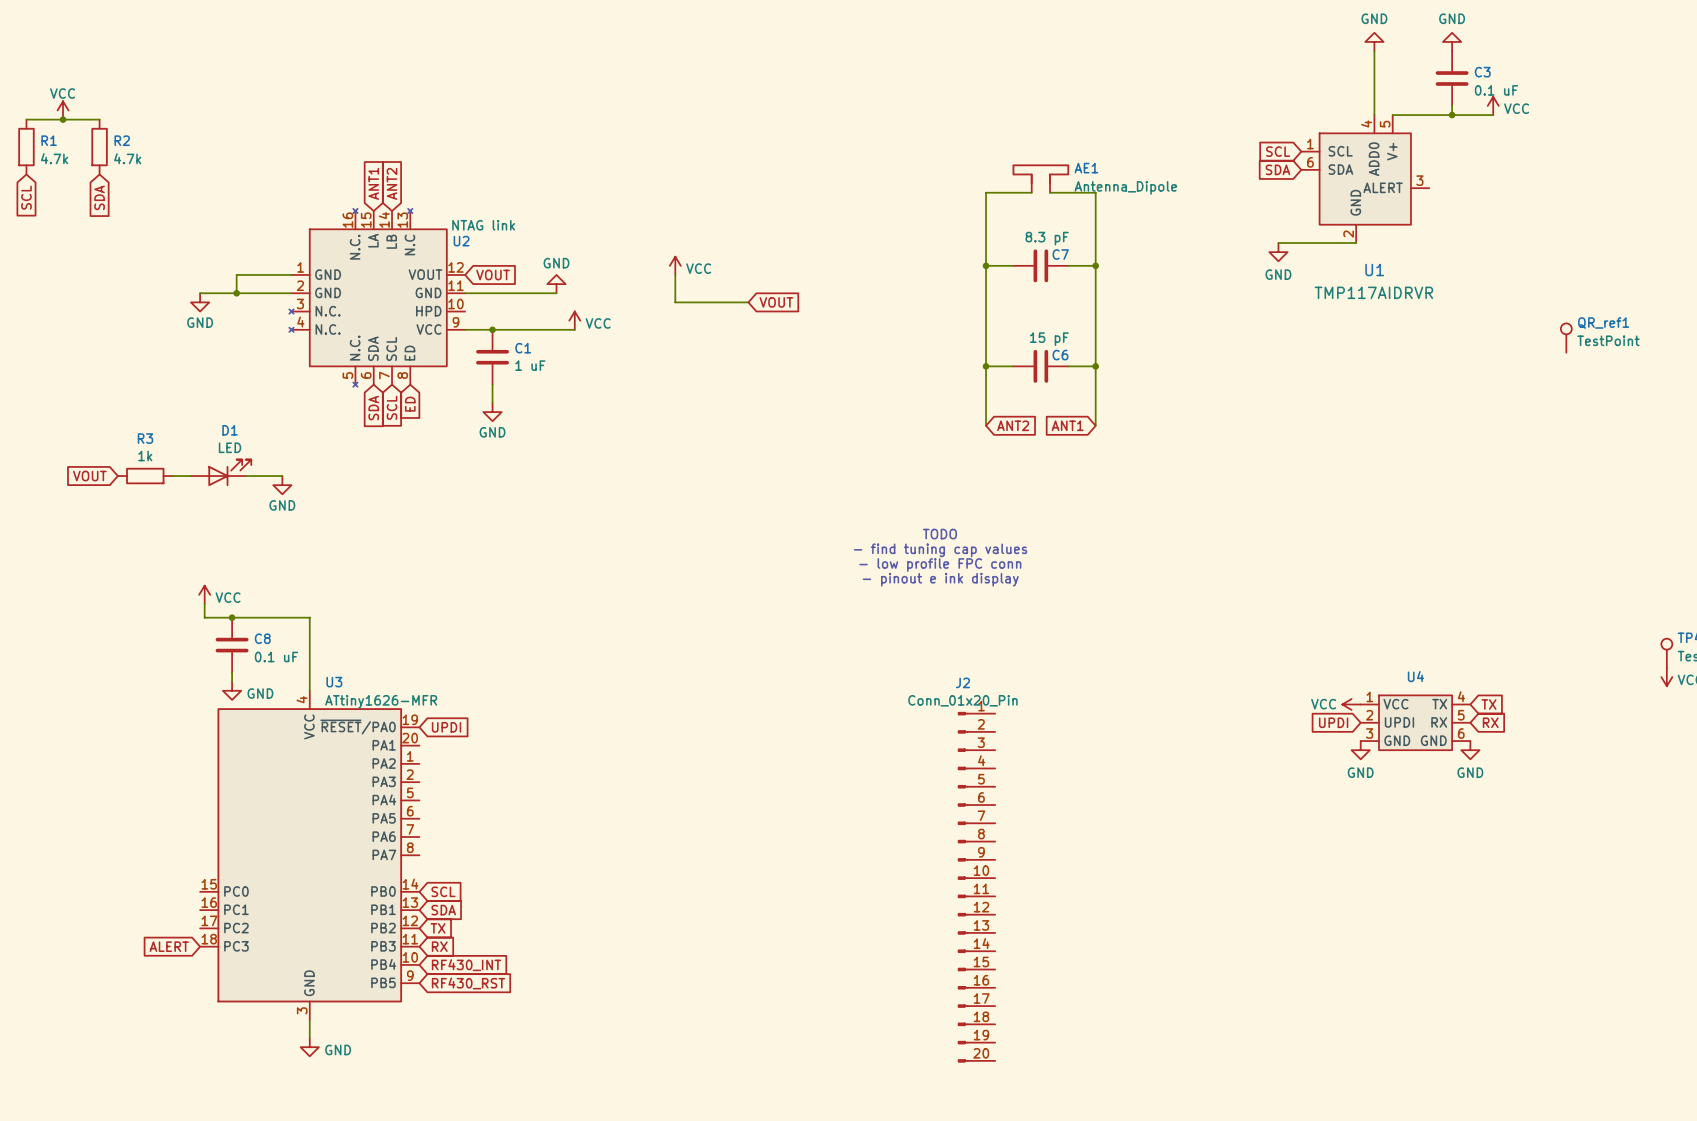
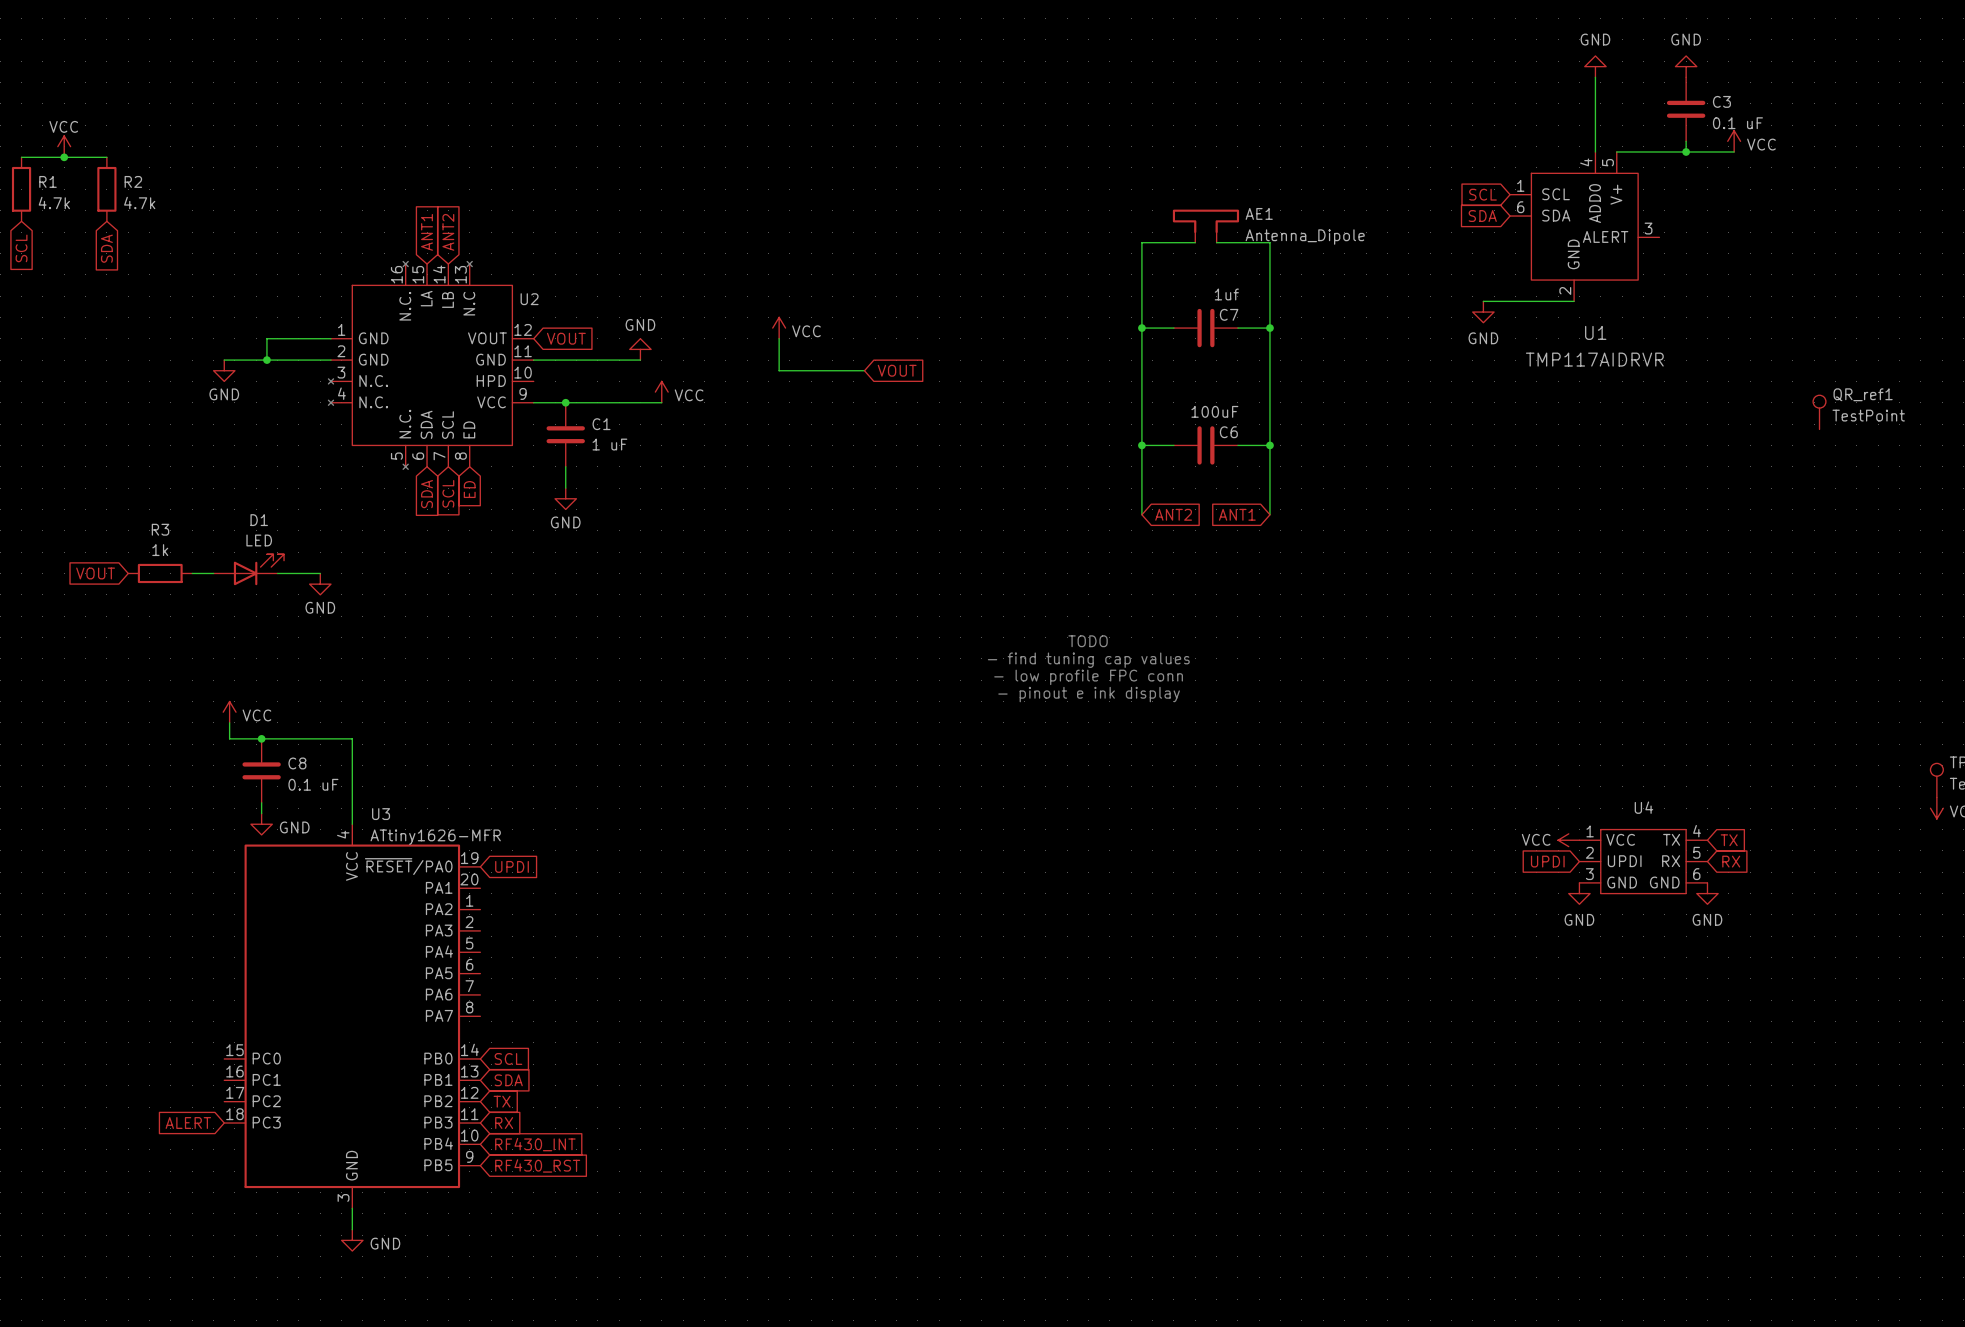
U2 value: NTAG link (483, 225) -> none
C7 value: 8.3 pF (1047, 238) -> 1uf (1226, 294)
C6 value: 15 pF (1049, 339) -> 100uF (1214, 411)
J2: Conn_01x20_Pin (976, 887) -> none

